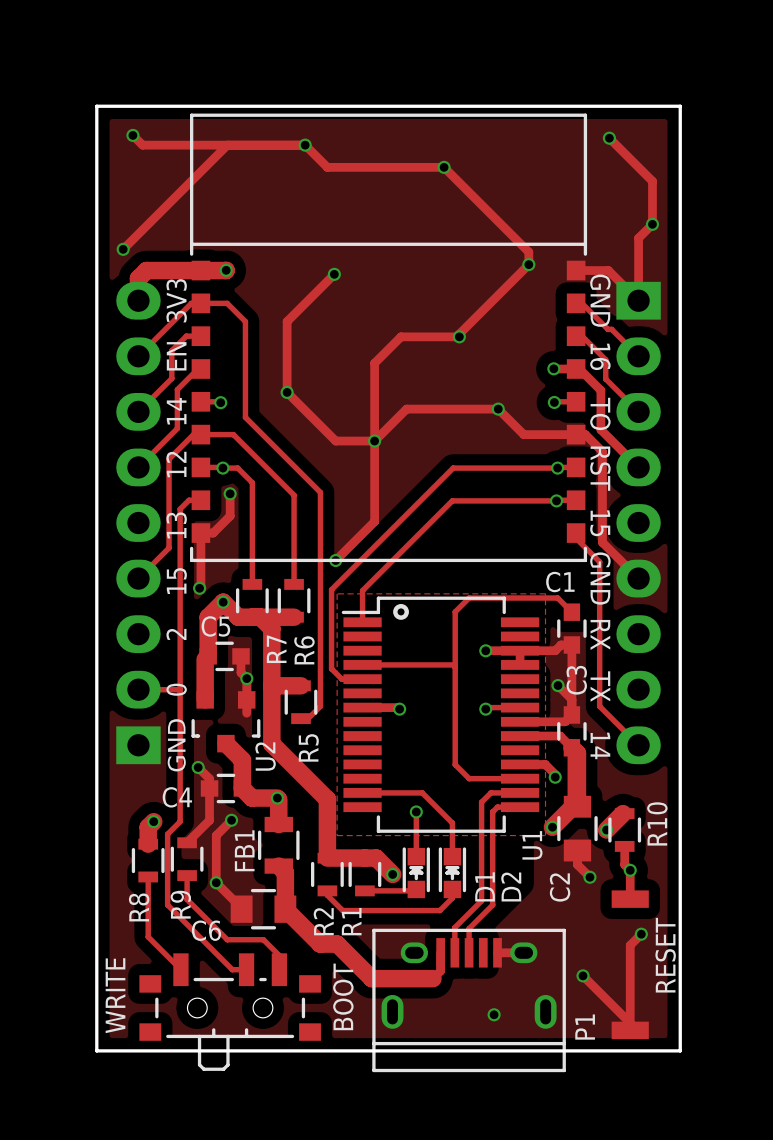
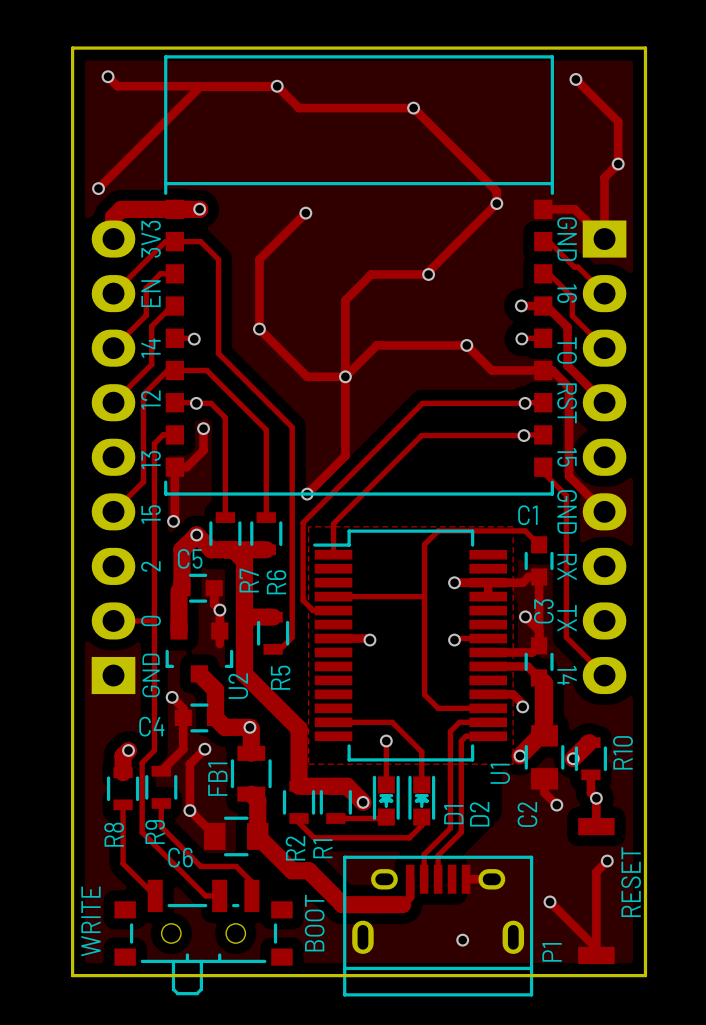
drawing: [393, 604, 409, 620] -> none

